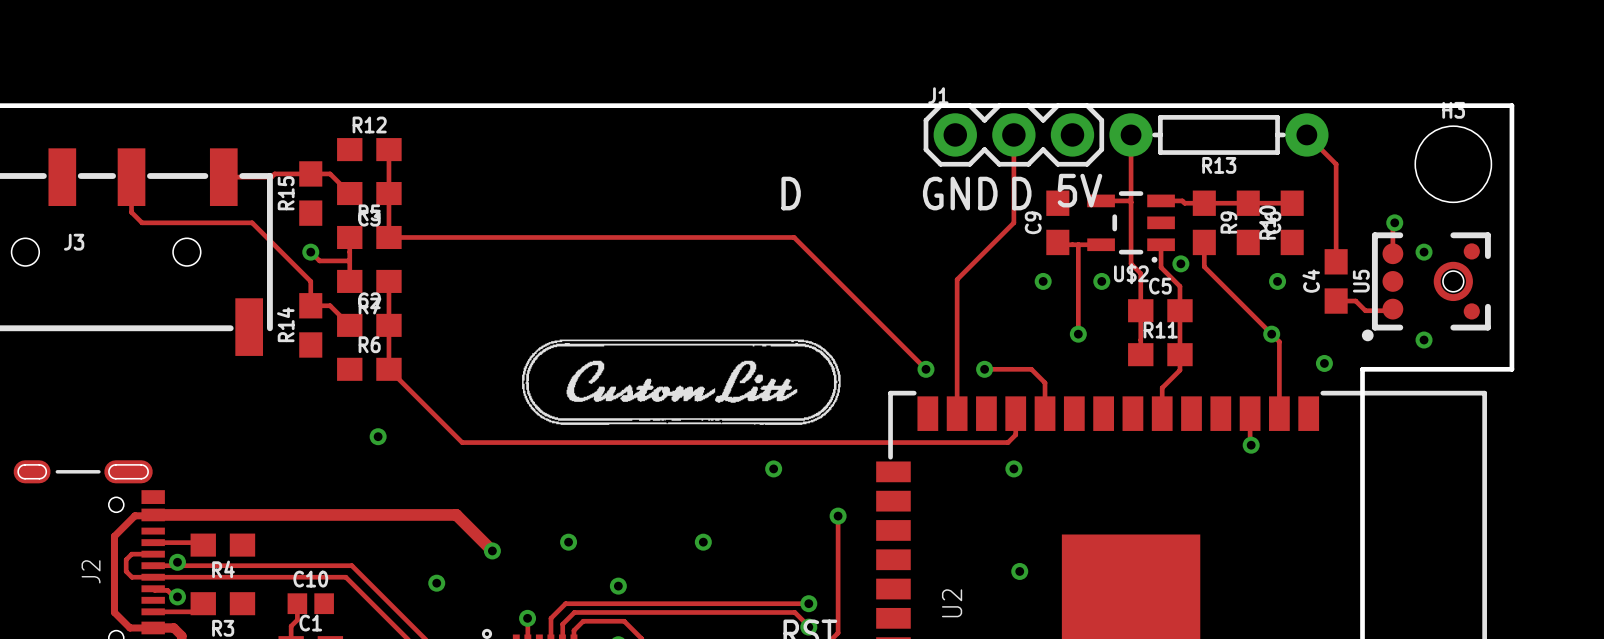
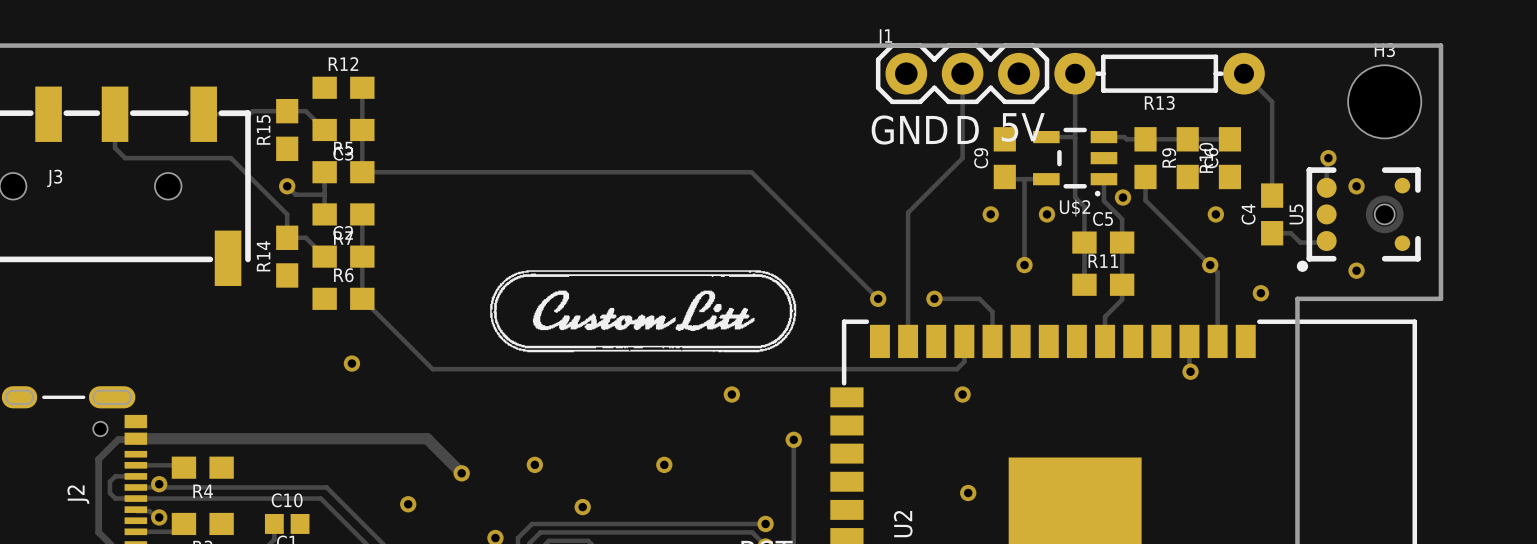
text: D (791, 193) -> none

